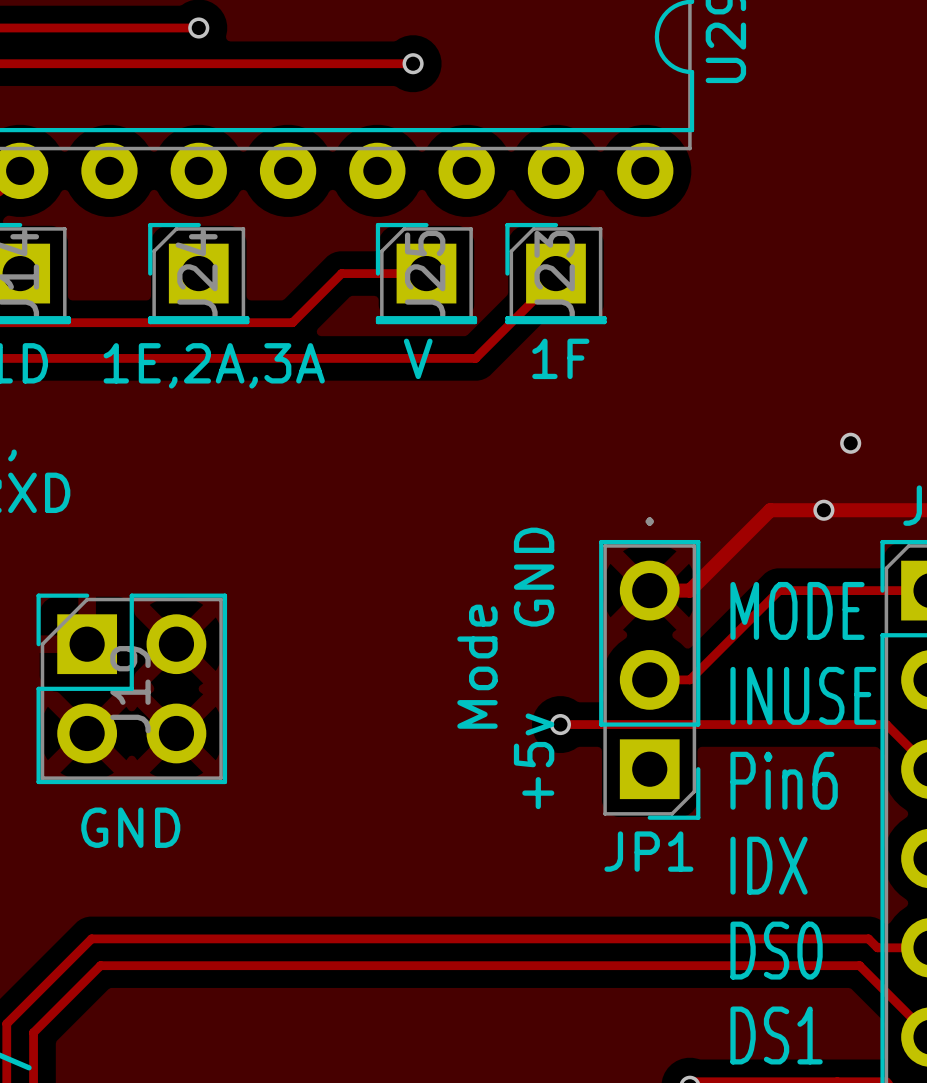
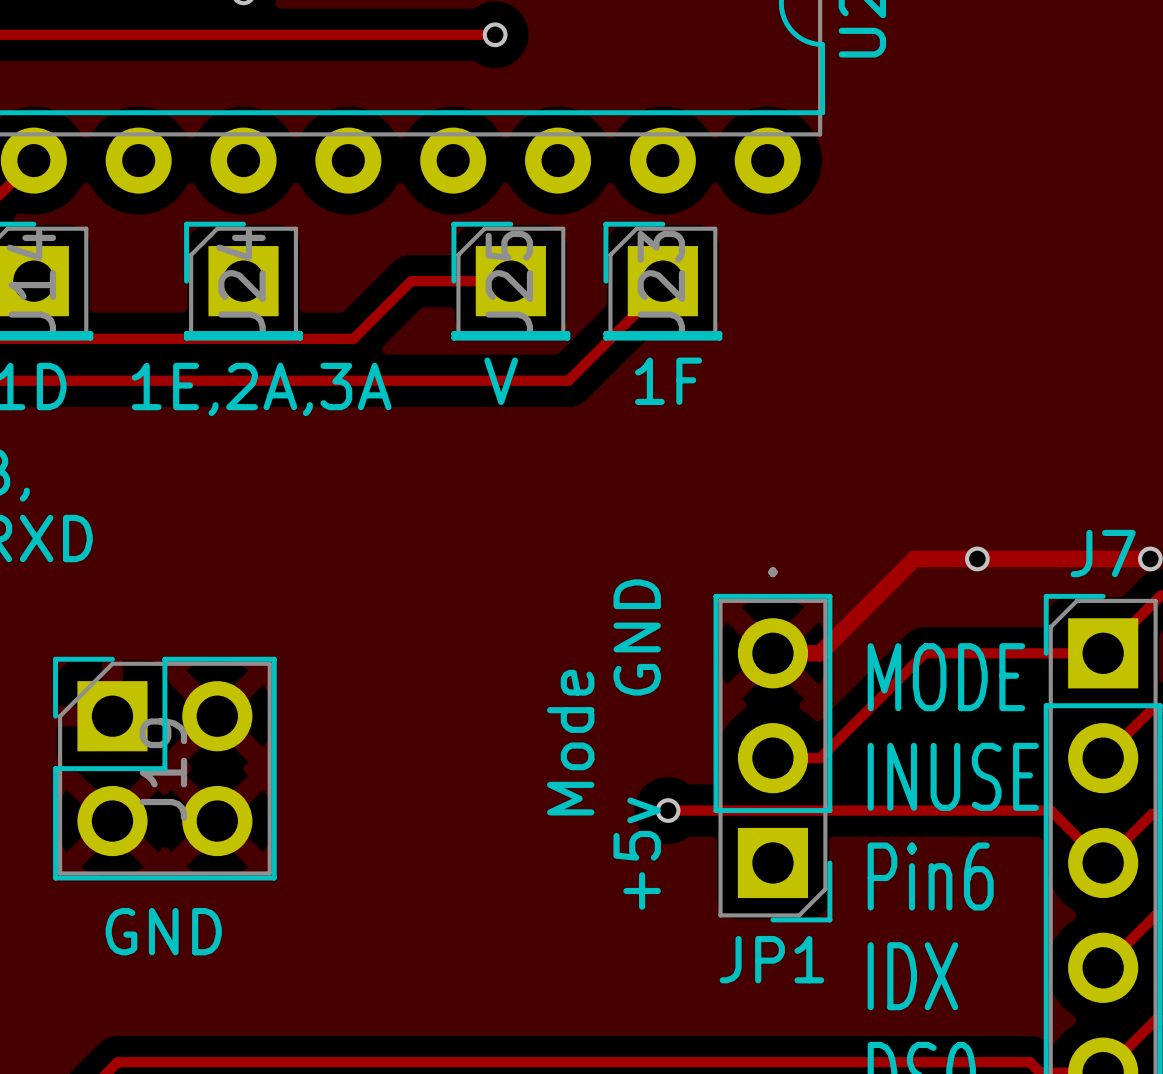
via: (850, 443) -> none

